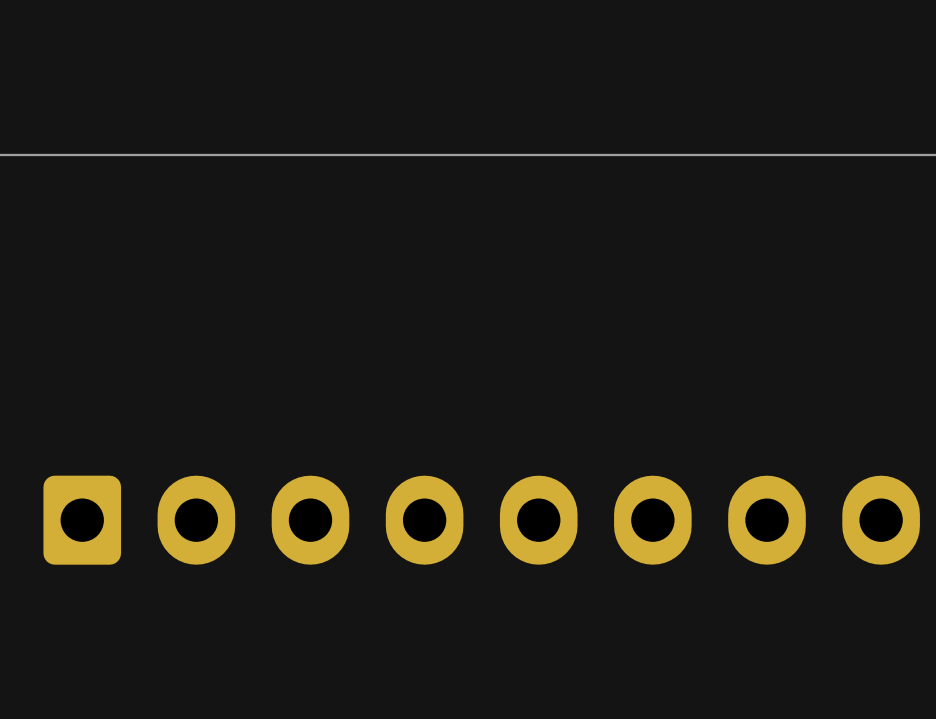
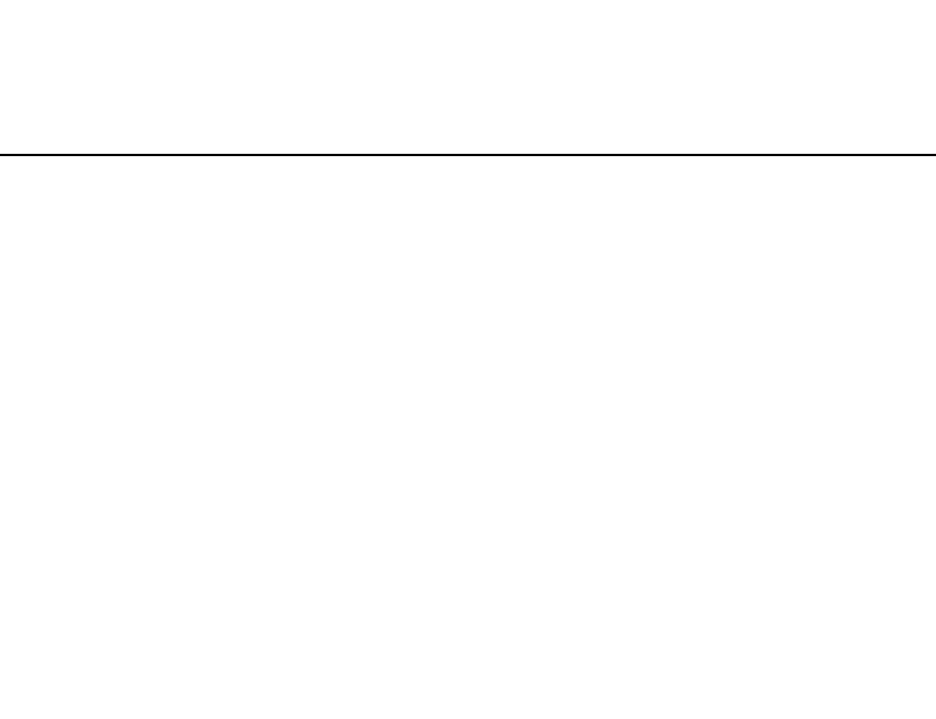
part: (481, 520) -> none

